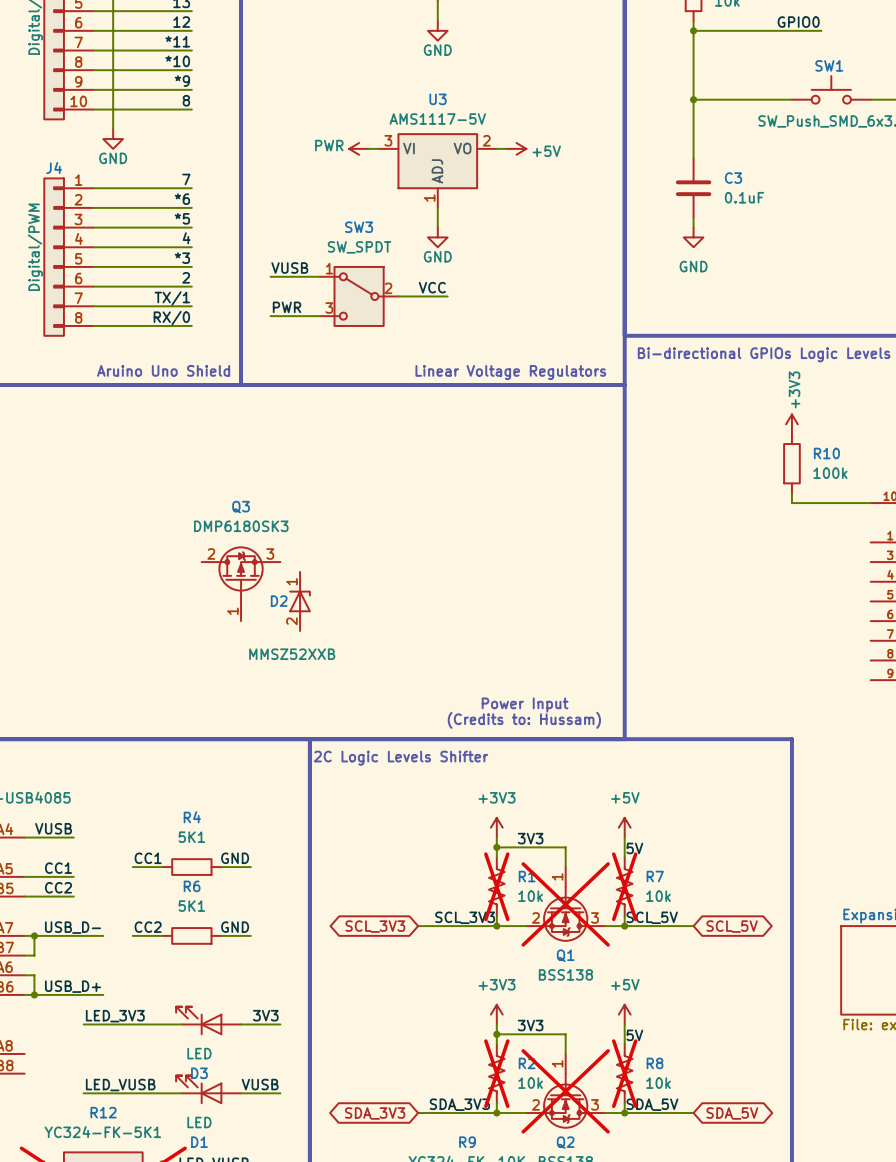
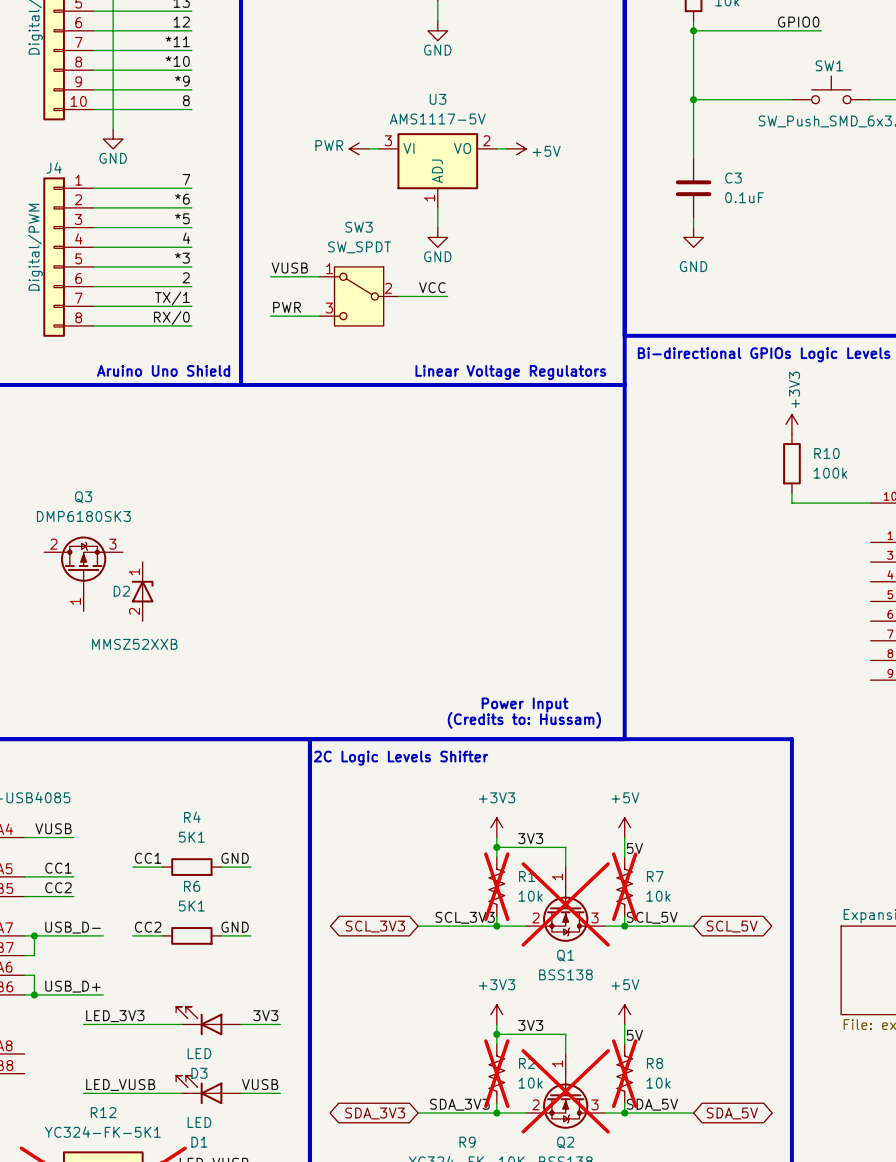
Q3 position: (241, 583) -> (83, 573)
D2 position: (300, 601) -> (142, 591)

